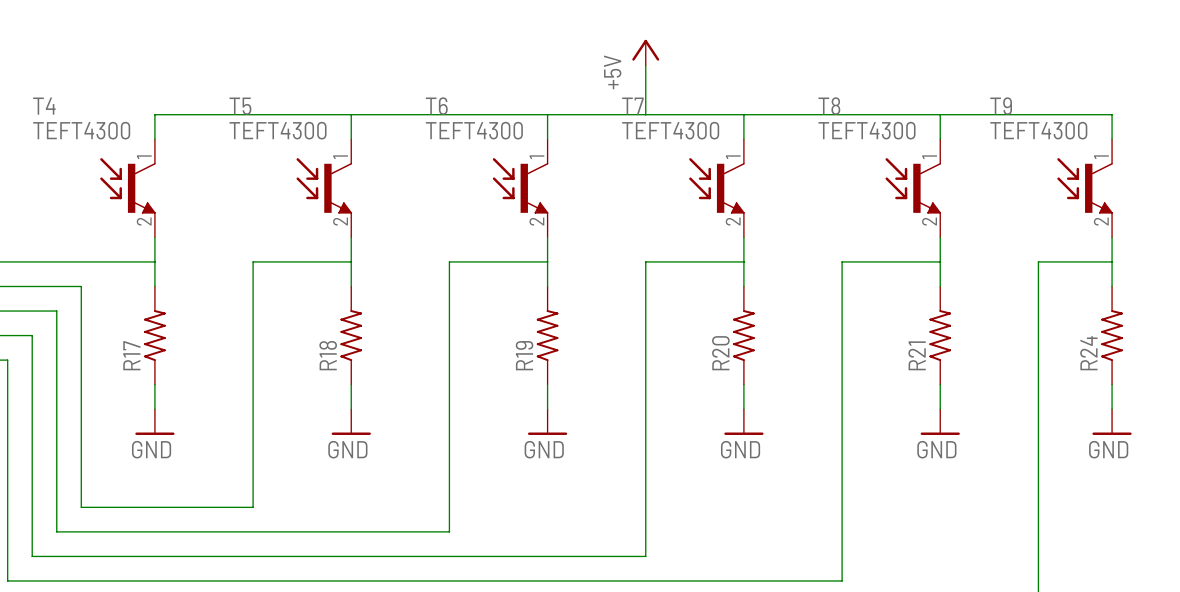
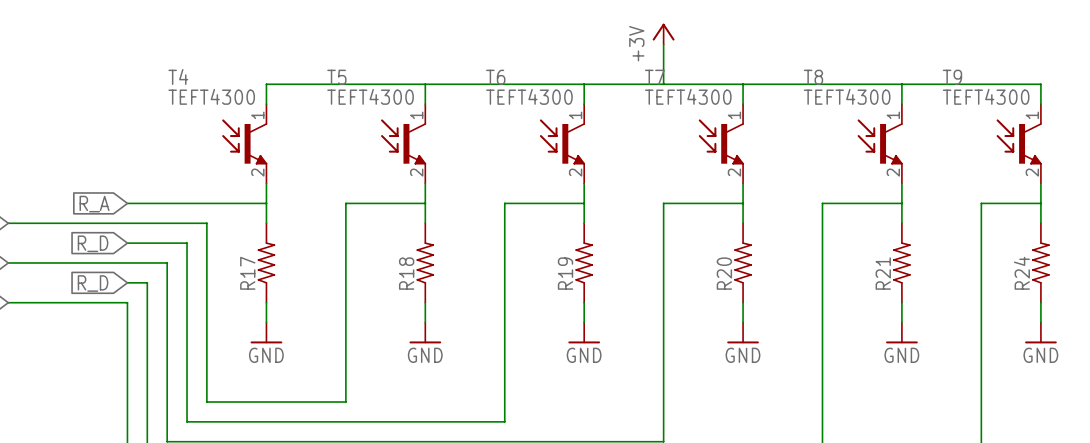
power symbol: +5V (645, 52) -> +3V (663, 34)

